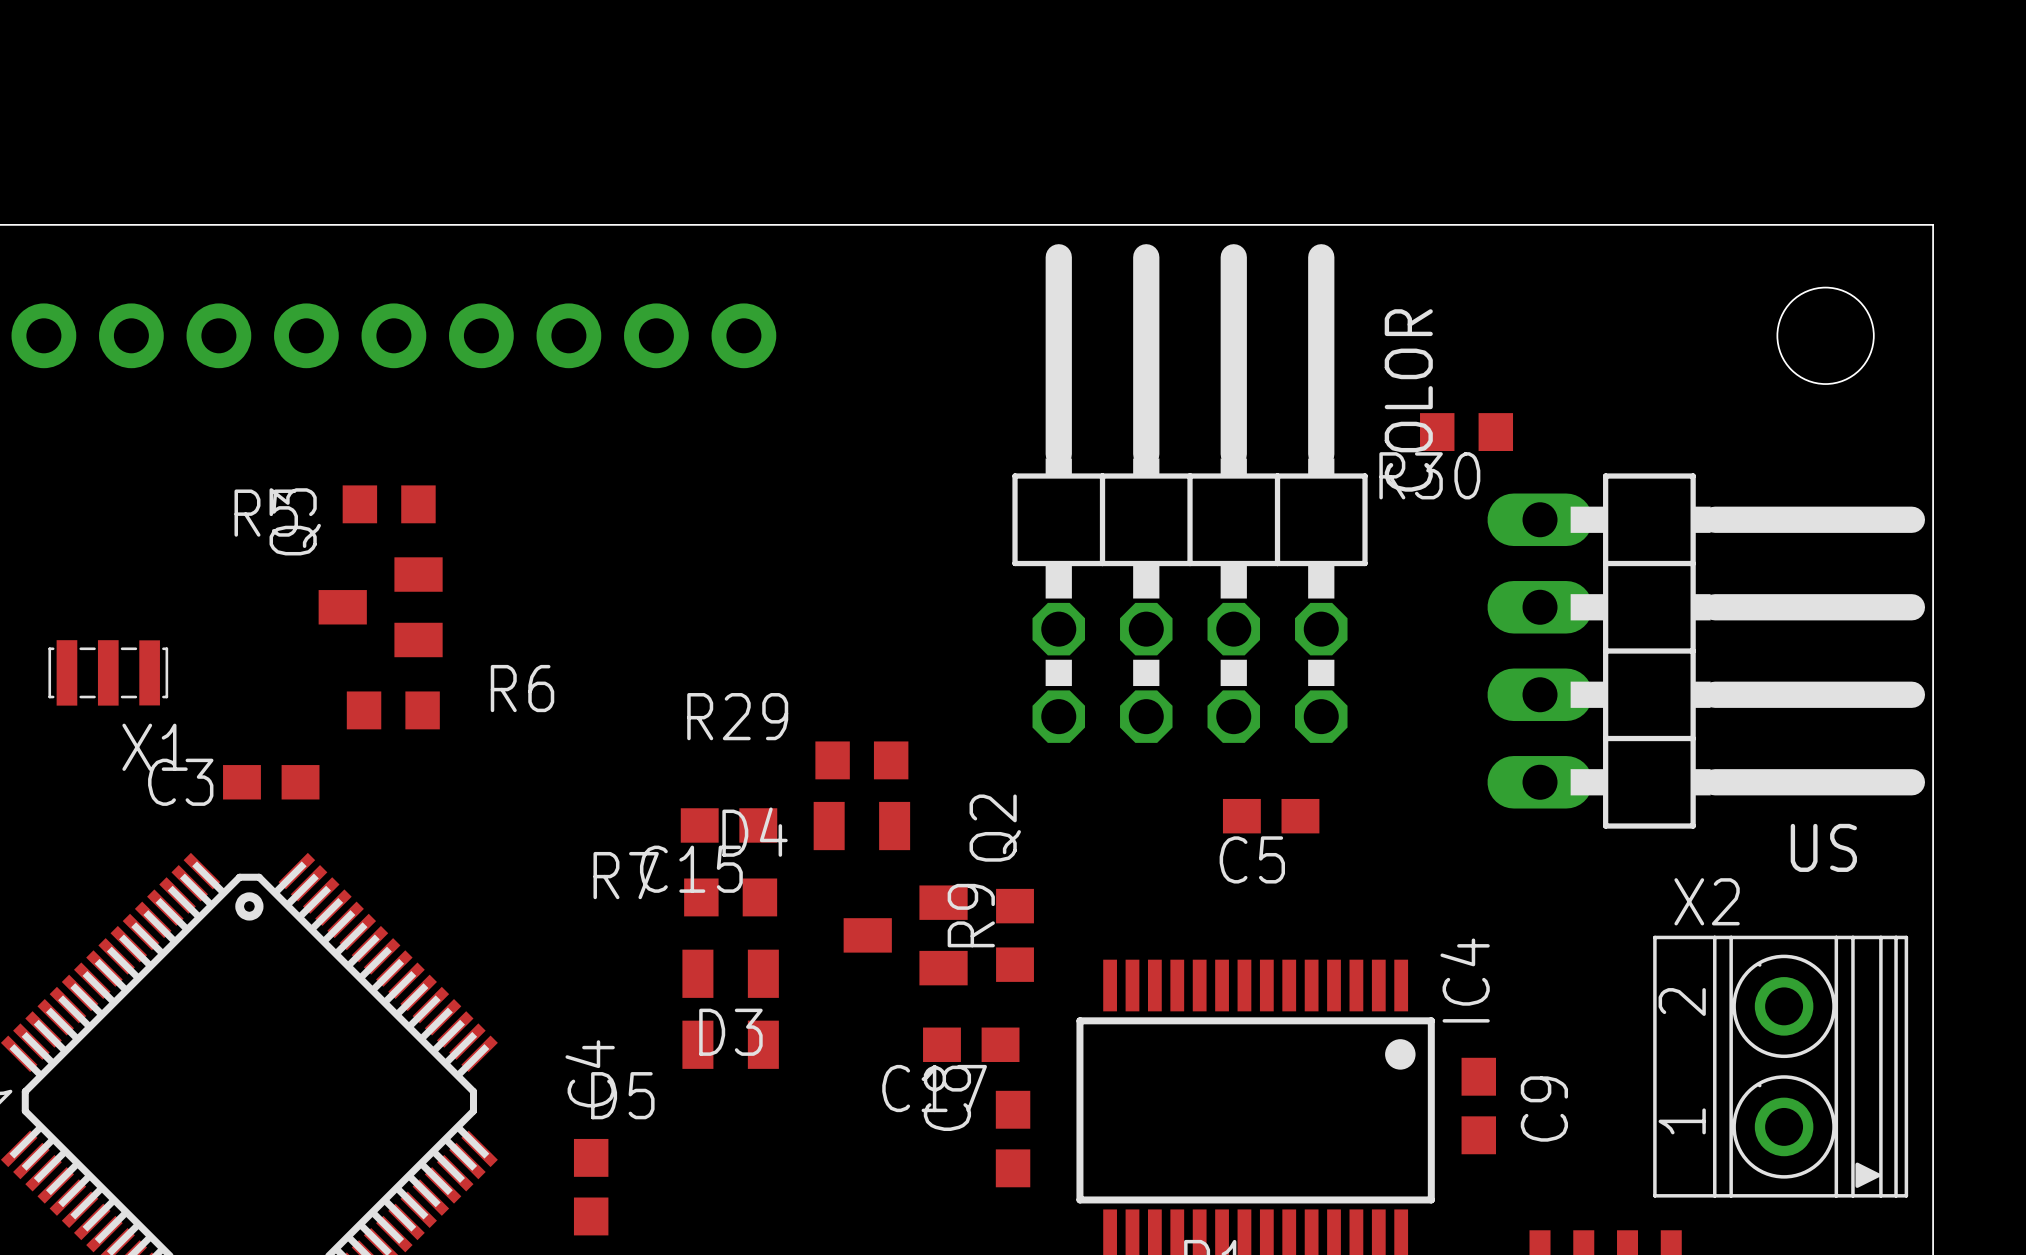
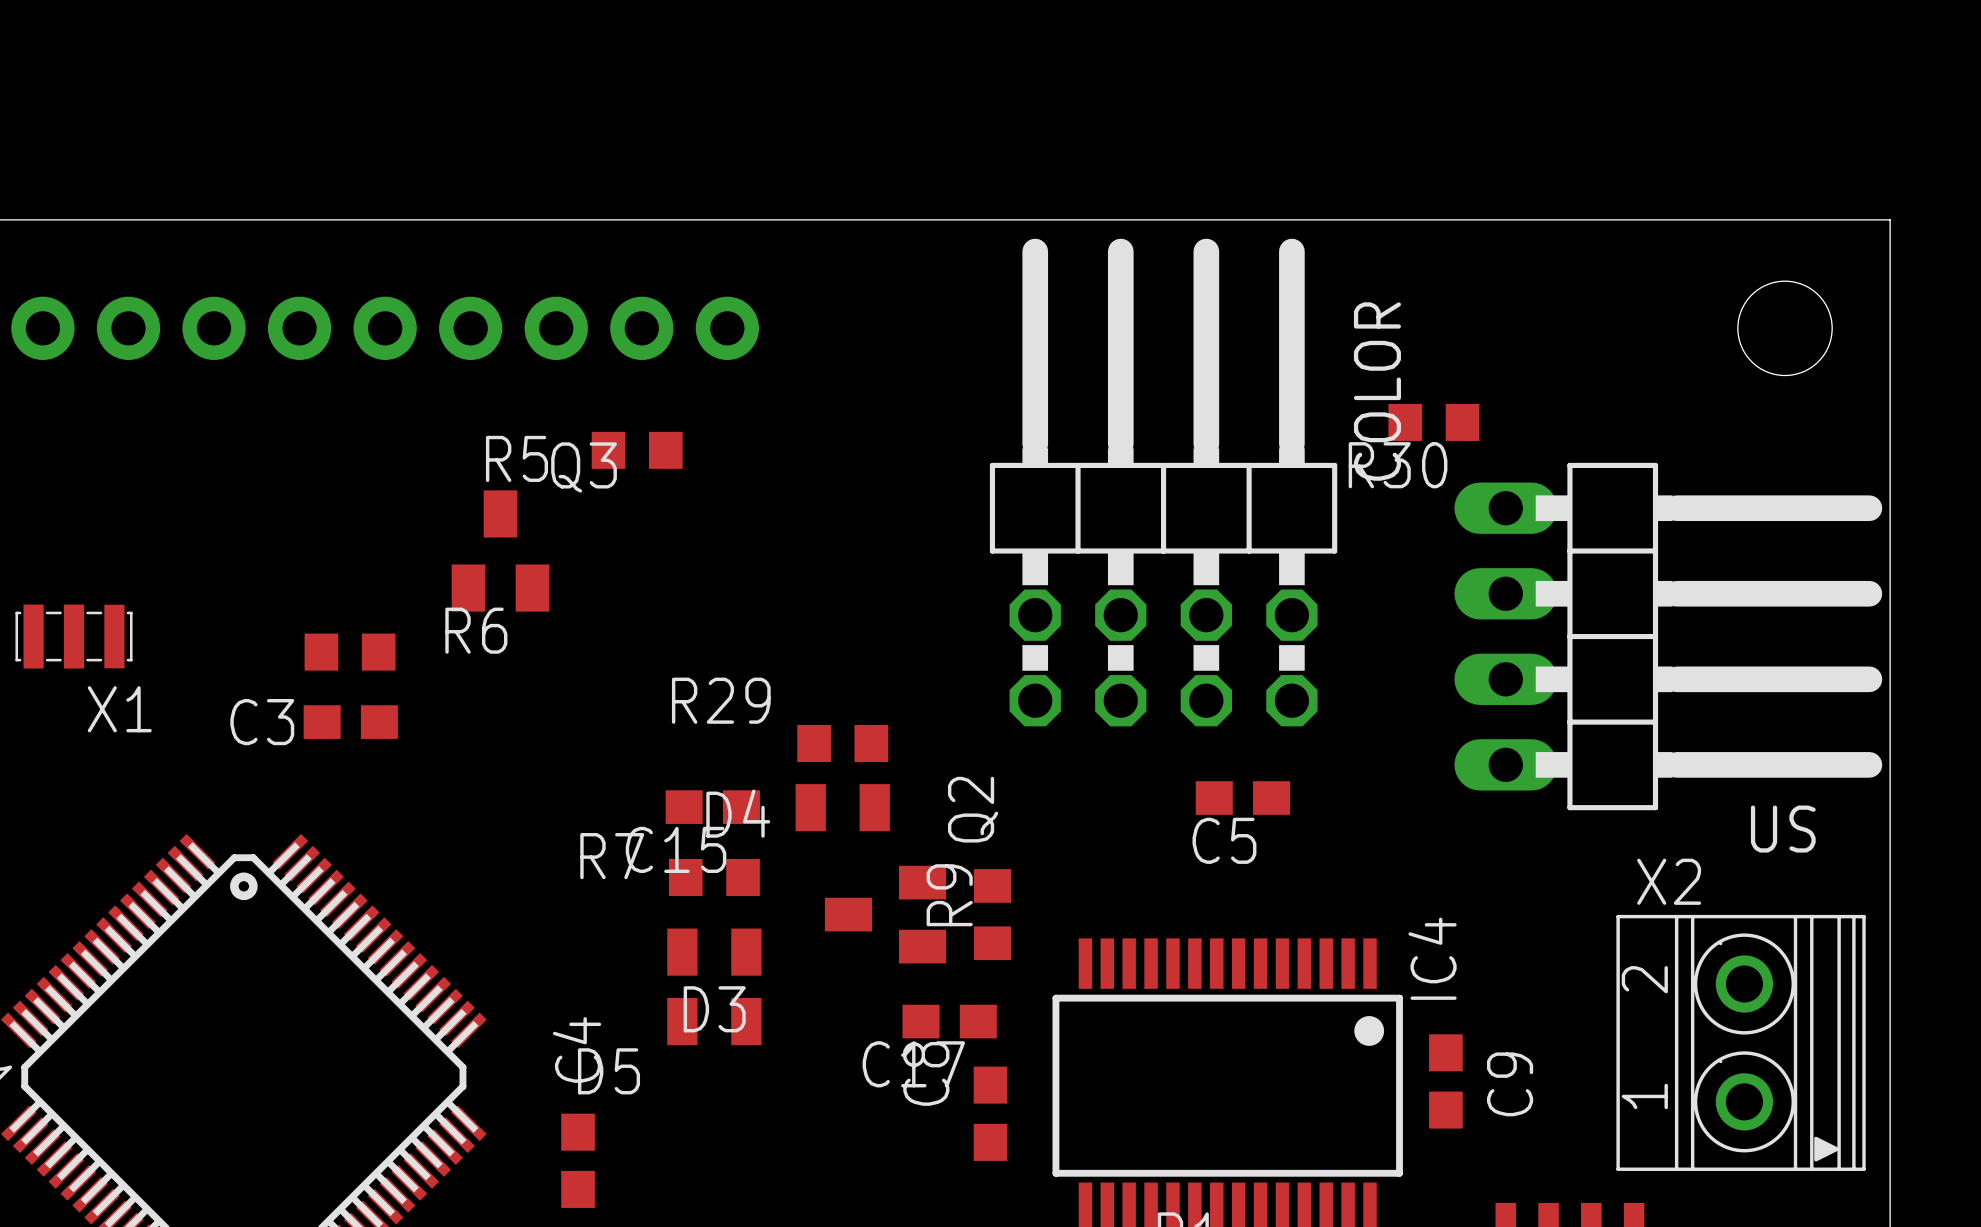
R5 position: (389, 504) -> (637, 450)
Q3 rotation: 0° (380, 607) -> 90° clockwise (500, 550)
Q3 position: (380, 607) -> (500, 550)
X1 position: (108, 672) -> (74, 636)
R6 position: (393, 710) -> (350, 652)
C3 position: (271, 782) -> (350, 722)

